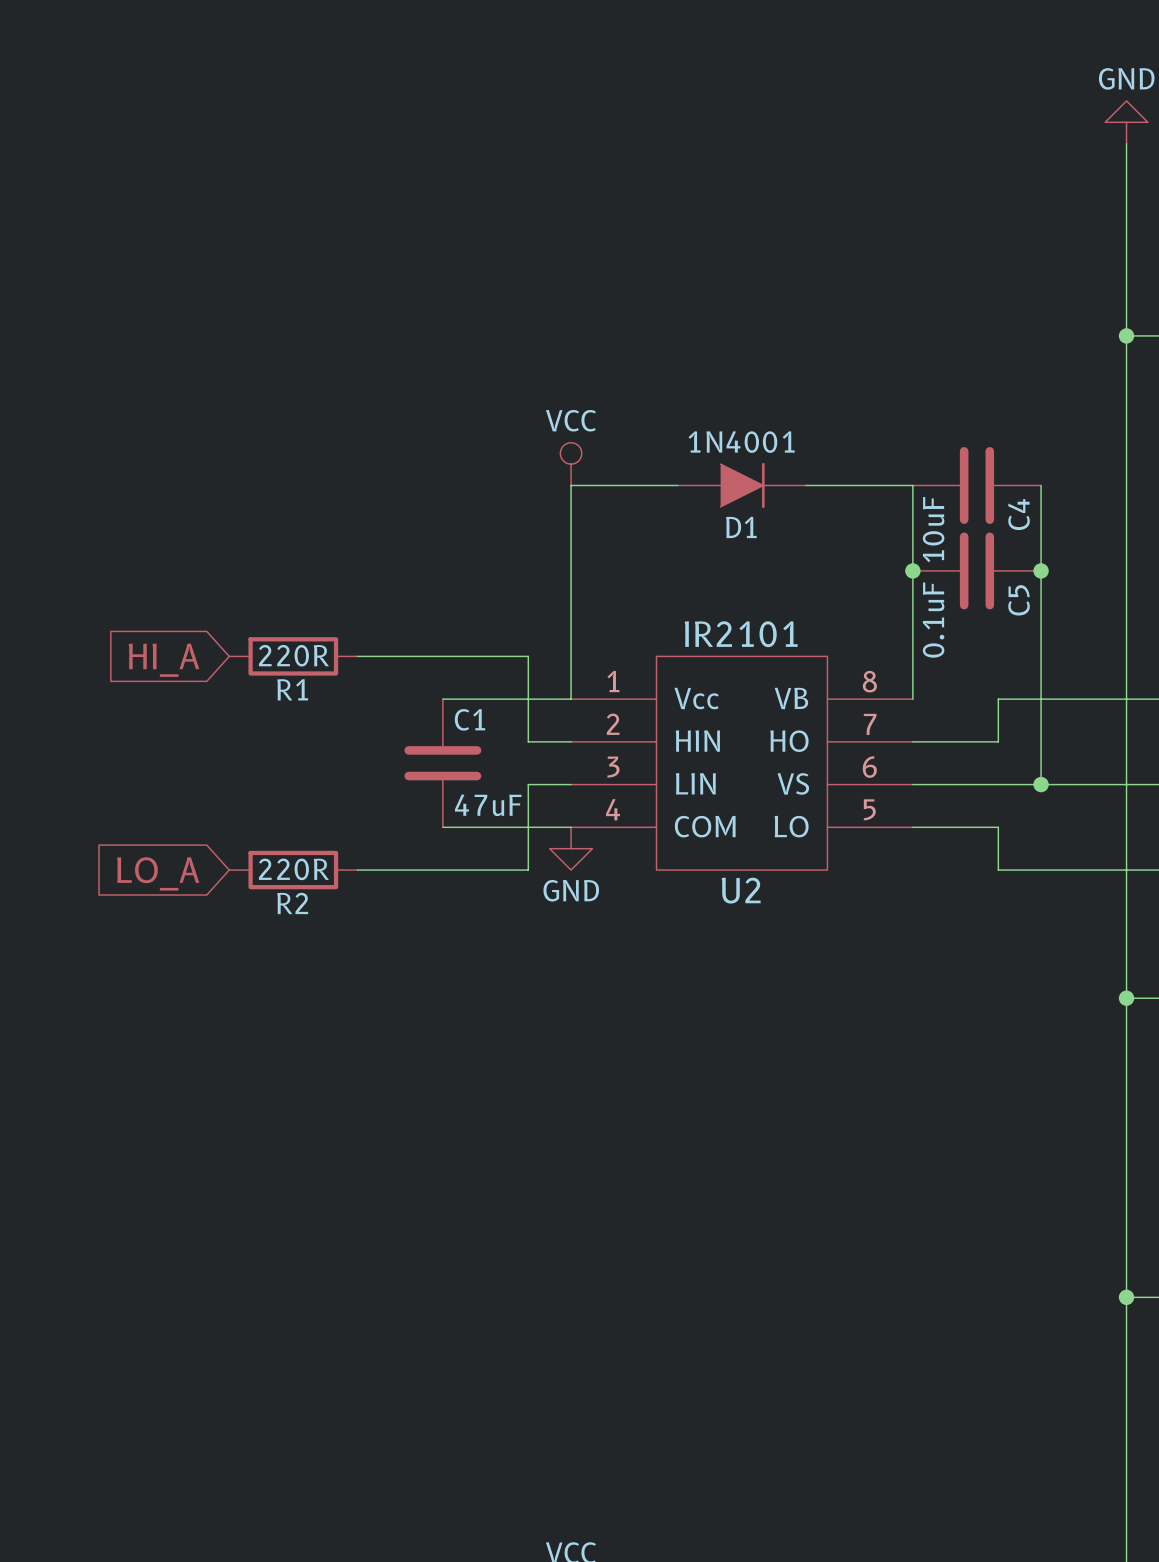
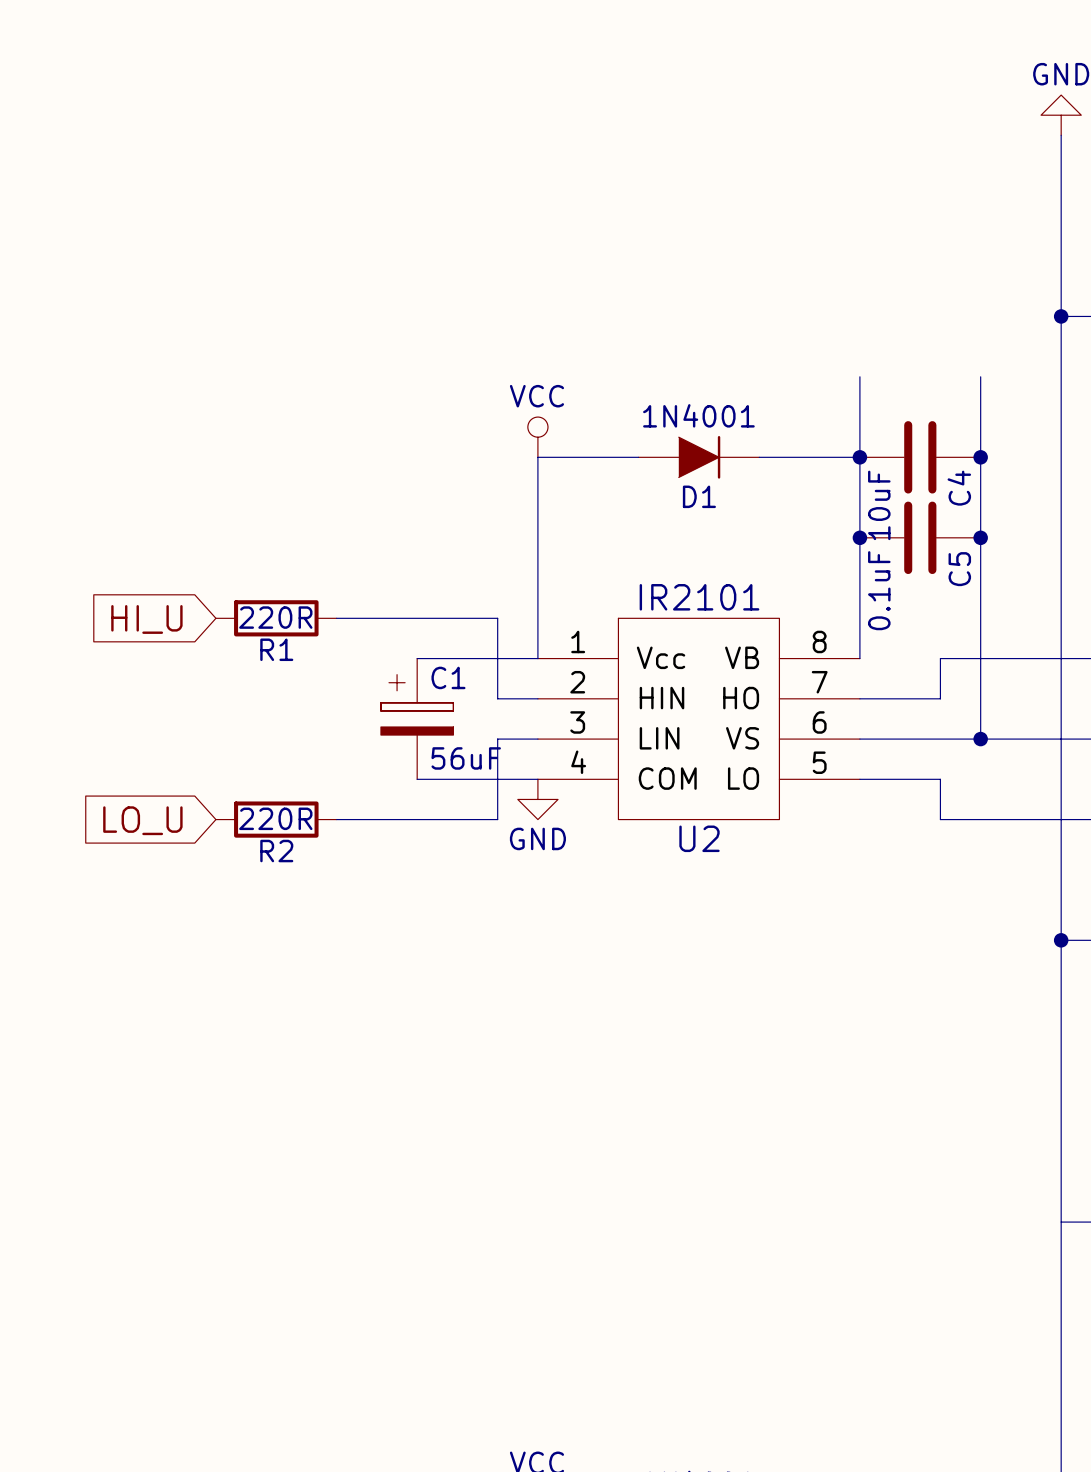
wire: none -> (859, 376) (859, 457)
wire: none -> (980, 376) (980, 457)
junction: none -> (859, 457)
junction: none -> (980, 457)
global label: HI_A (164, 660) -> HI_U (146, 619)
C1 symbol: [404, 699, 482, 828] -> [380, 658, 454, 780]
C1 value: 47uF (488, 805) -> 56uF (466, 758)
global label: LO_A (158, 873) -> LO_U (142, 820)
junction: (1126, 1297) -> none

